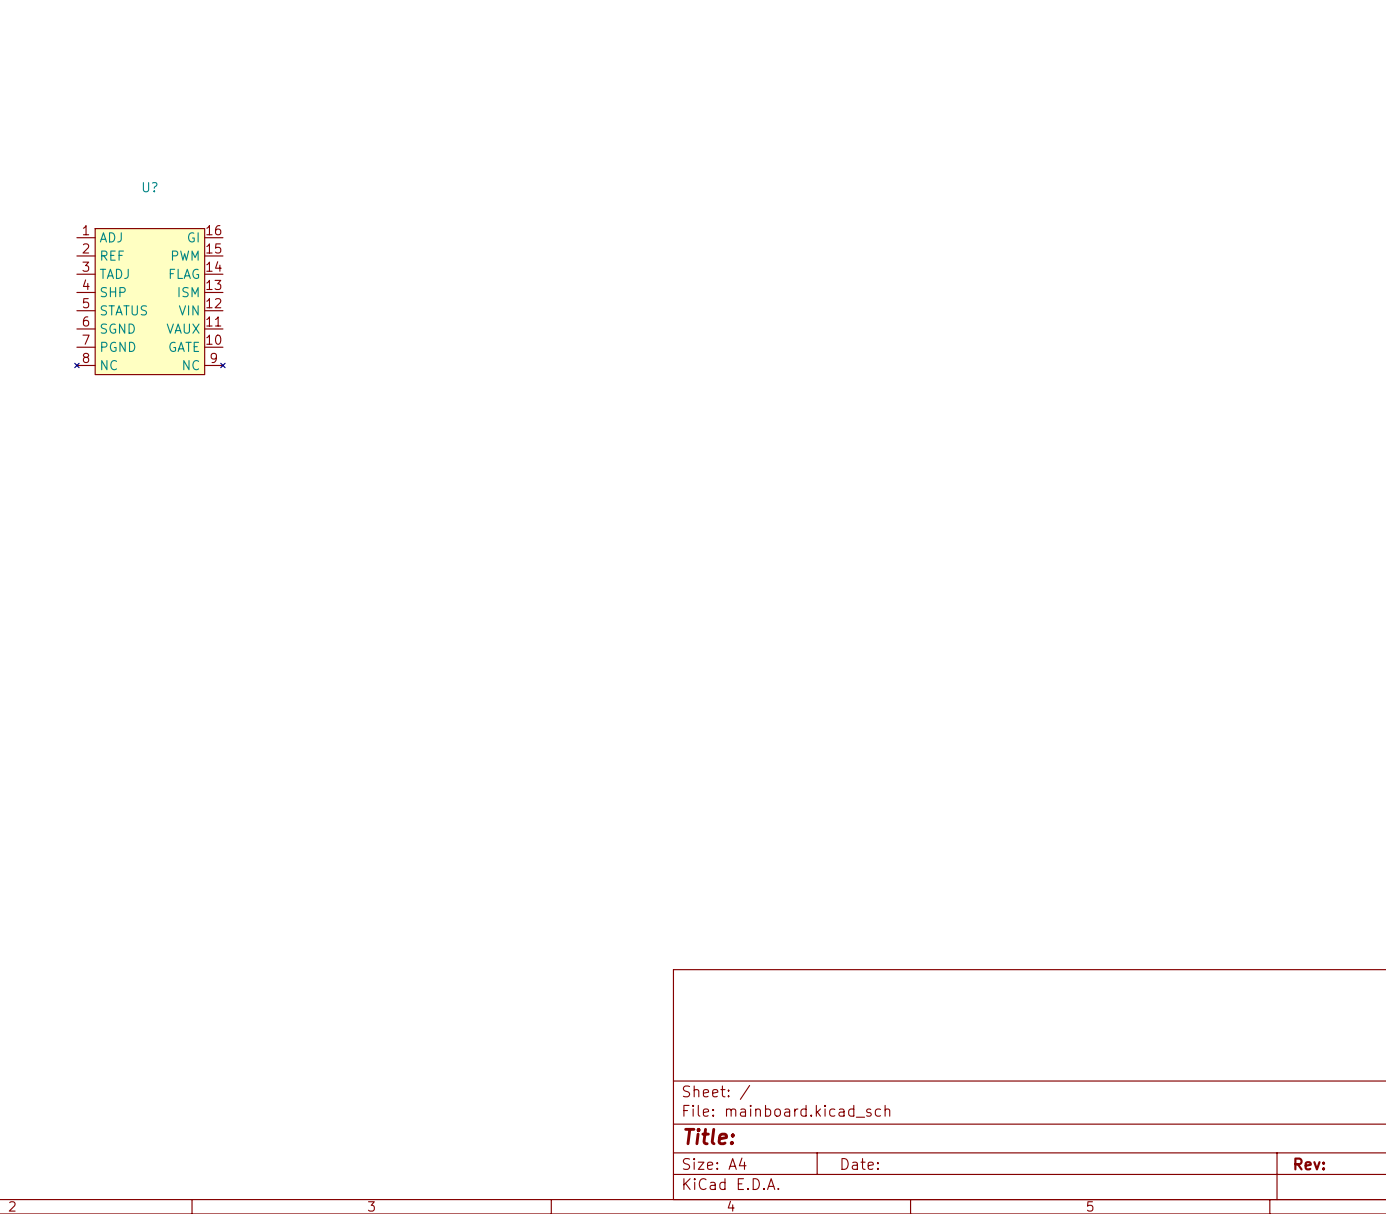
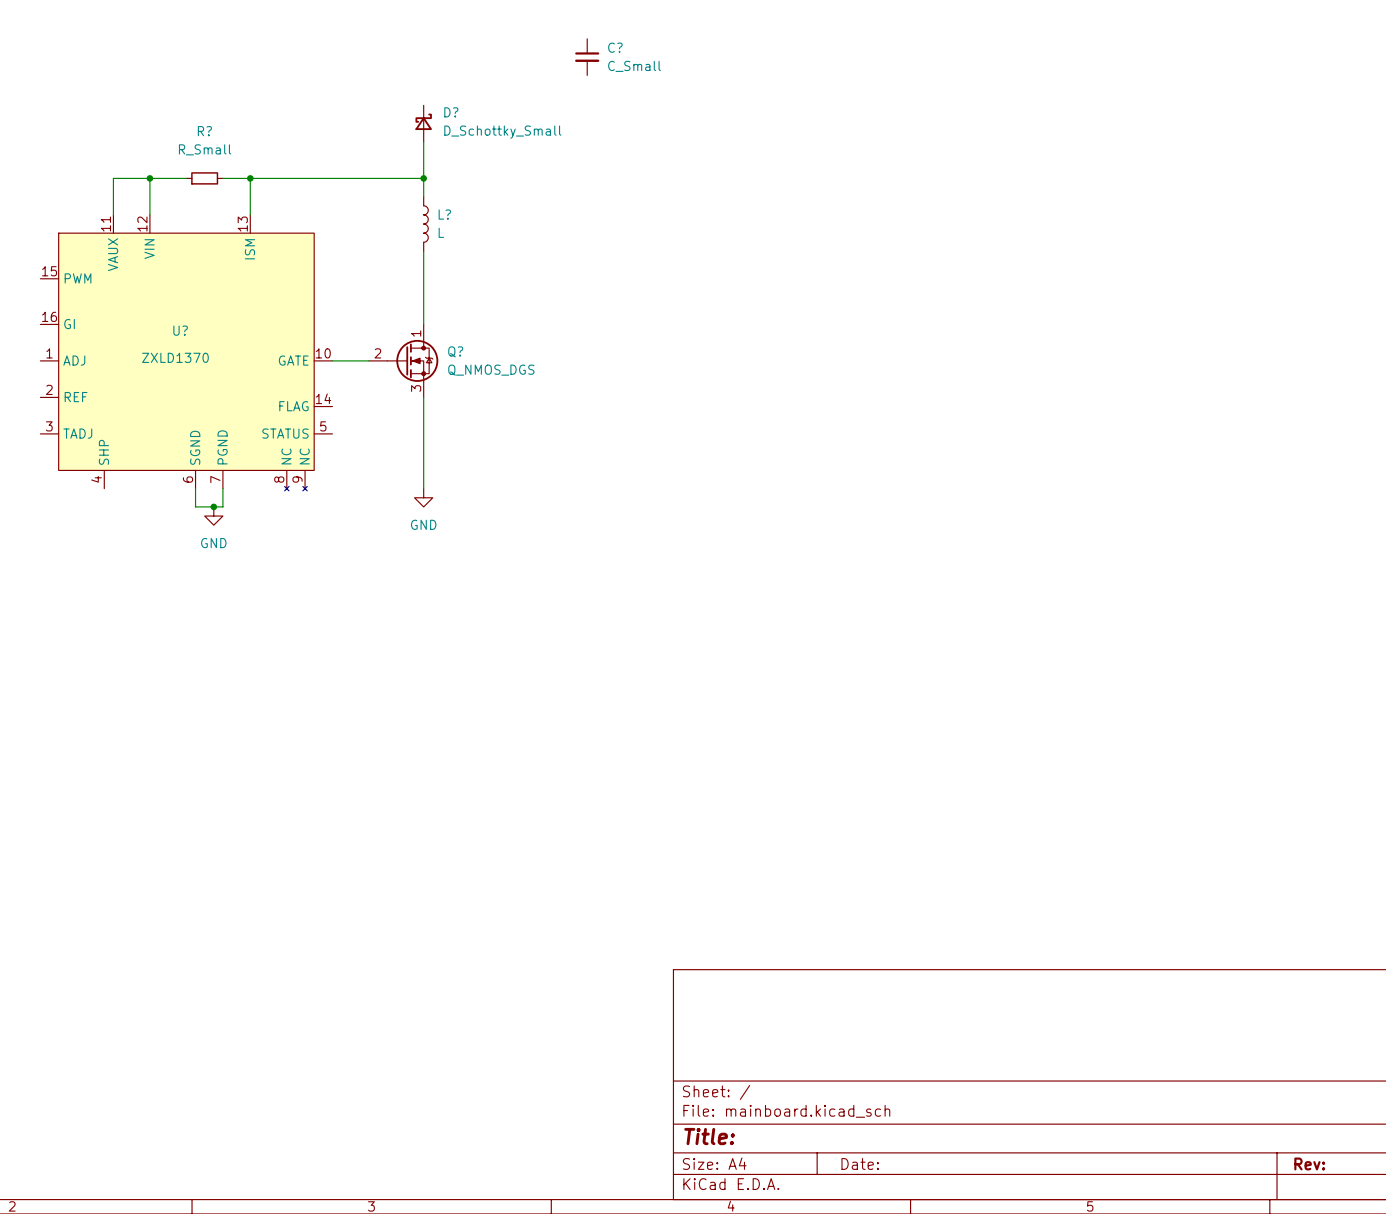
C?: none -> C_Small (587, 57)
D?: none -> D_Schottky_Small (423, 123)
wire: none -> (423, 141) (423, 196)
wire: none -> (149, 178) (149, 214)
junction: none -> (149, 178)
wire: none -> (186, 178) (113, 178) (113, 214)
R?: none -> R_Small (204, 178)
wire: none -> (222, 178) (423, 178)
wire: none -> (250, 178) (250, 214)
junction: none -> (250, 178)
junction: none -> (423, 178)
L?: none -> L (425, 224)
wire: none -> (423, 251) (423, 324)
U?: (149, 301) -> none
U?: none -> ZXLD1370 (186, 352)
wire: none -> (332, 360) (368, 360)
Q?: none -> Q_NMOS_DGS (403, 360)
wire: none -> (423, 397) (423, 488)
wire: none -> (195, 488) (195, 506) (222, 506) (222, 488)
power symbol: none -> GND (423, 497)
junction: none -> (213, 506)
power symbol: none -> GND (213, 516)

